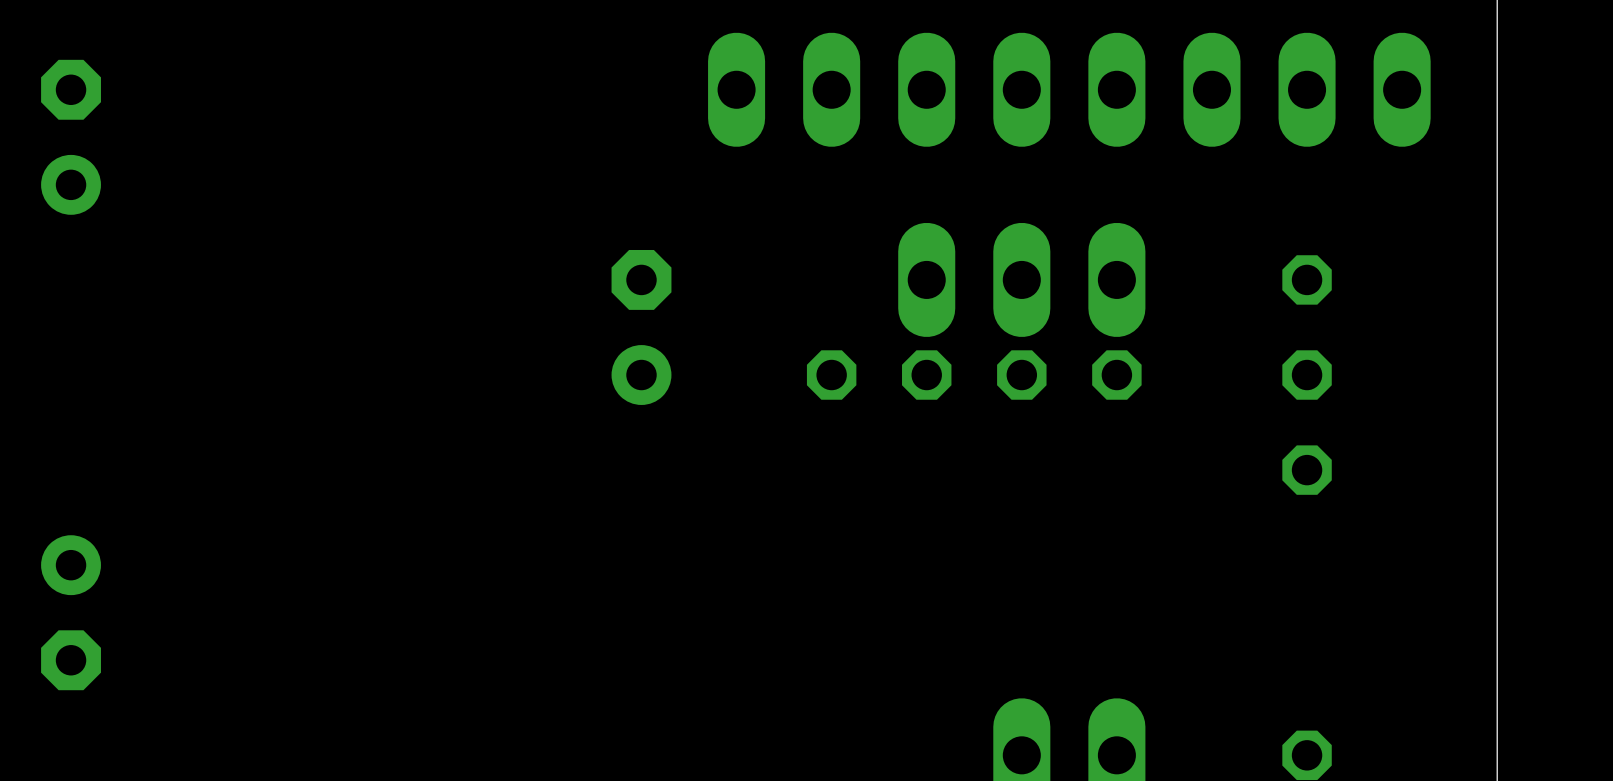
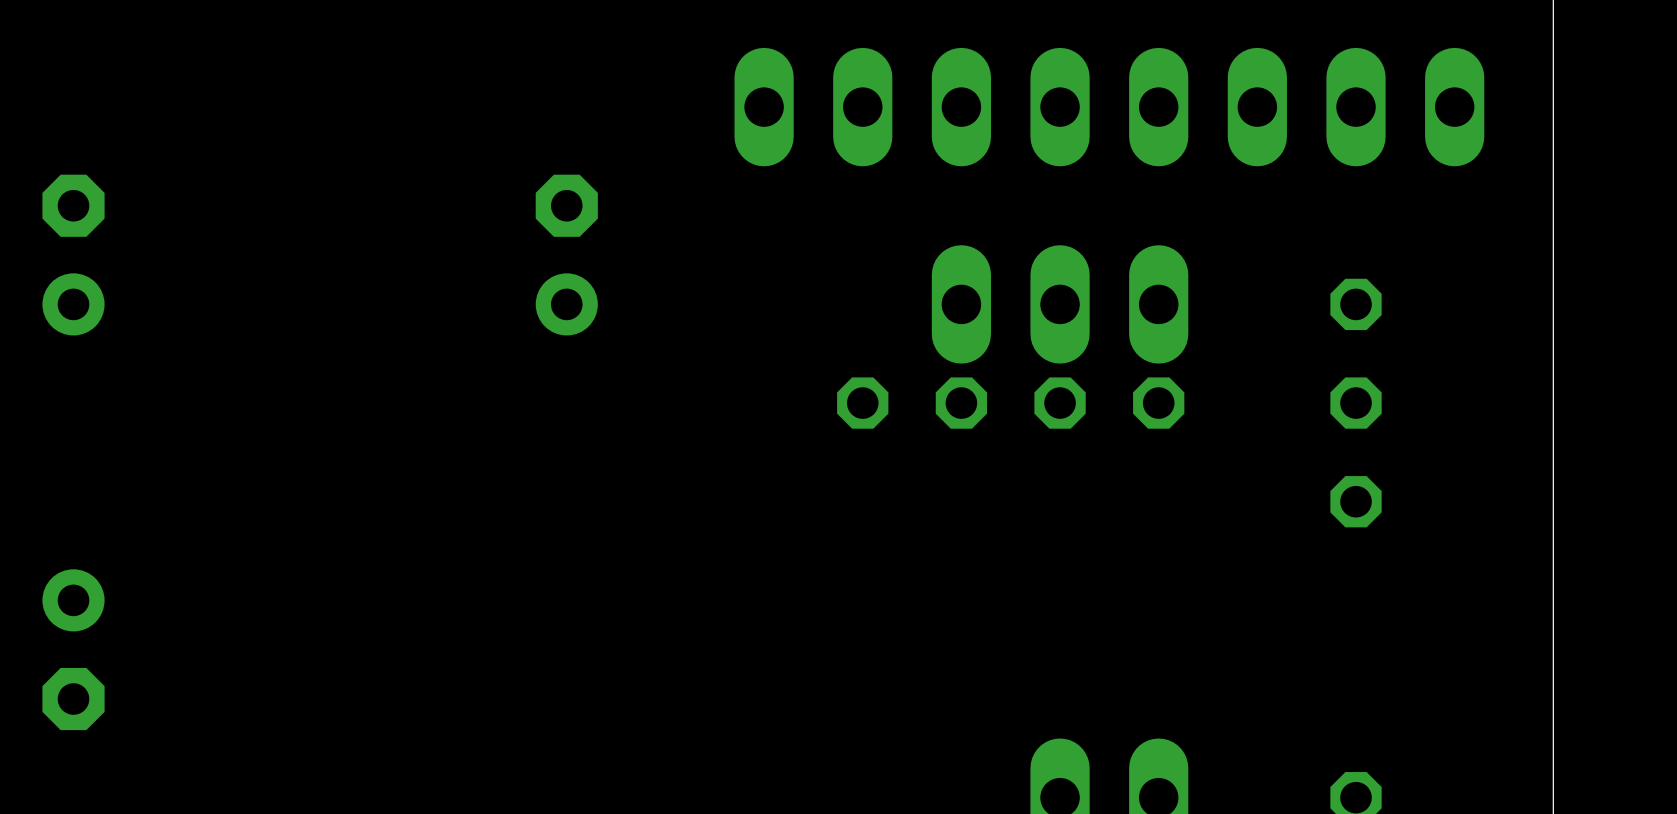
part position: (71, 137) -> (73, 255)
part position: (641, 327) -> (566, 255)

